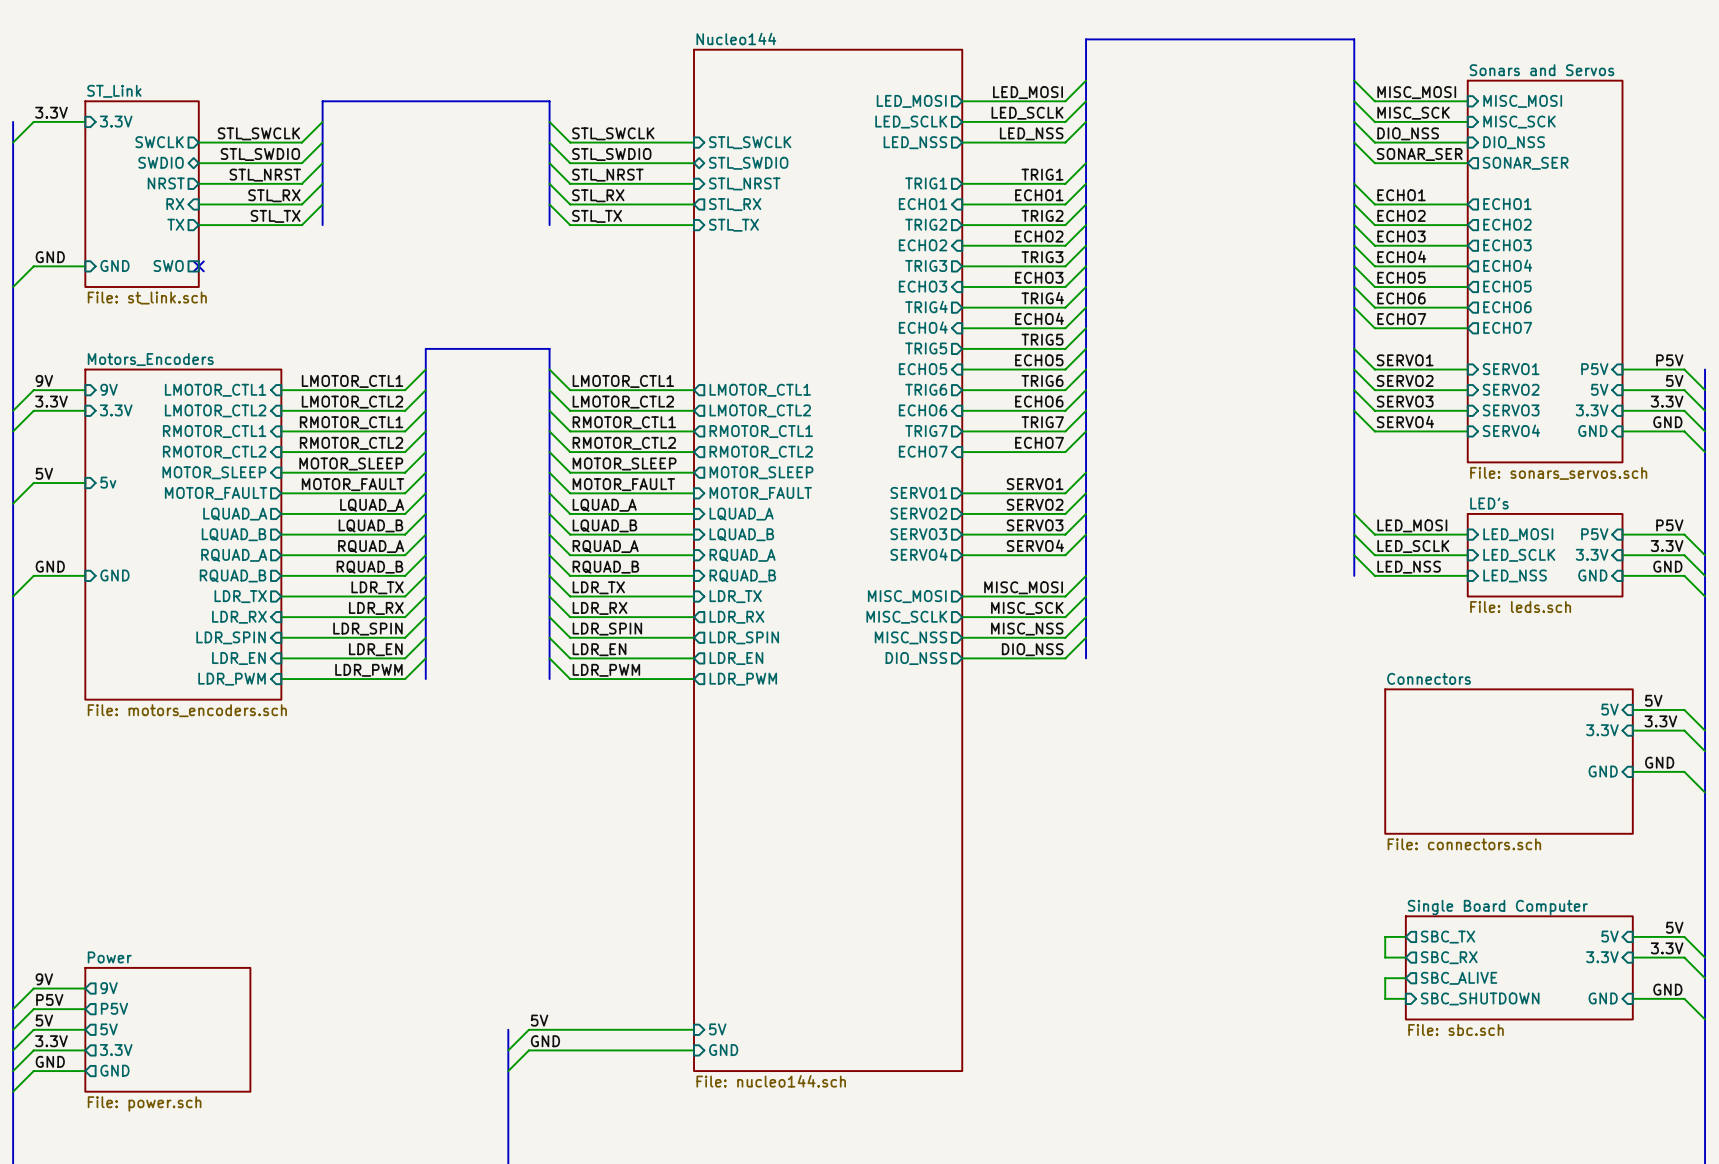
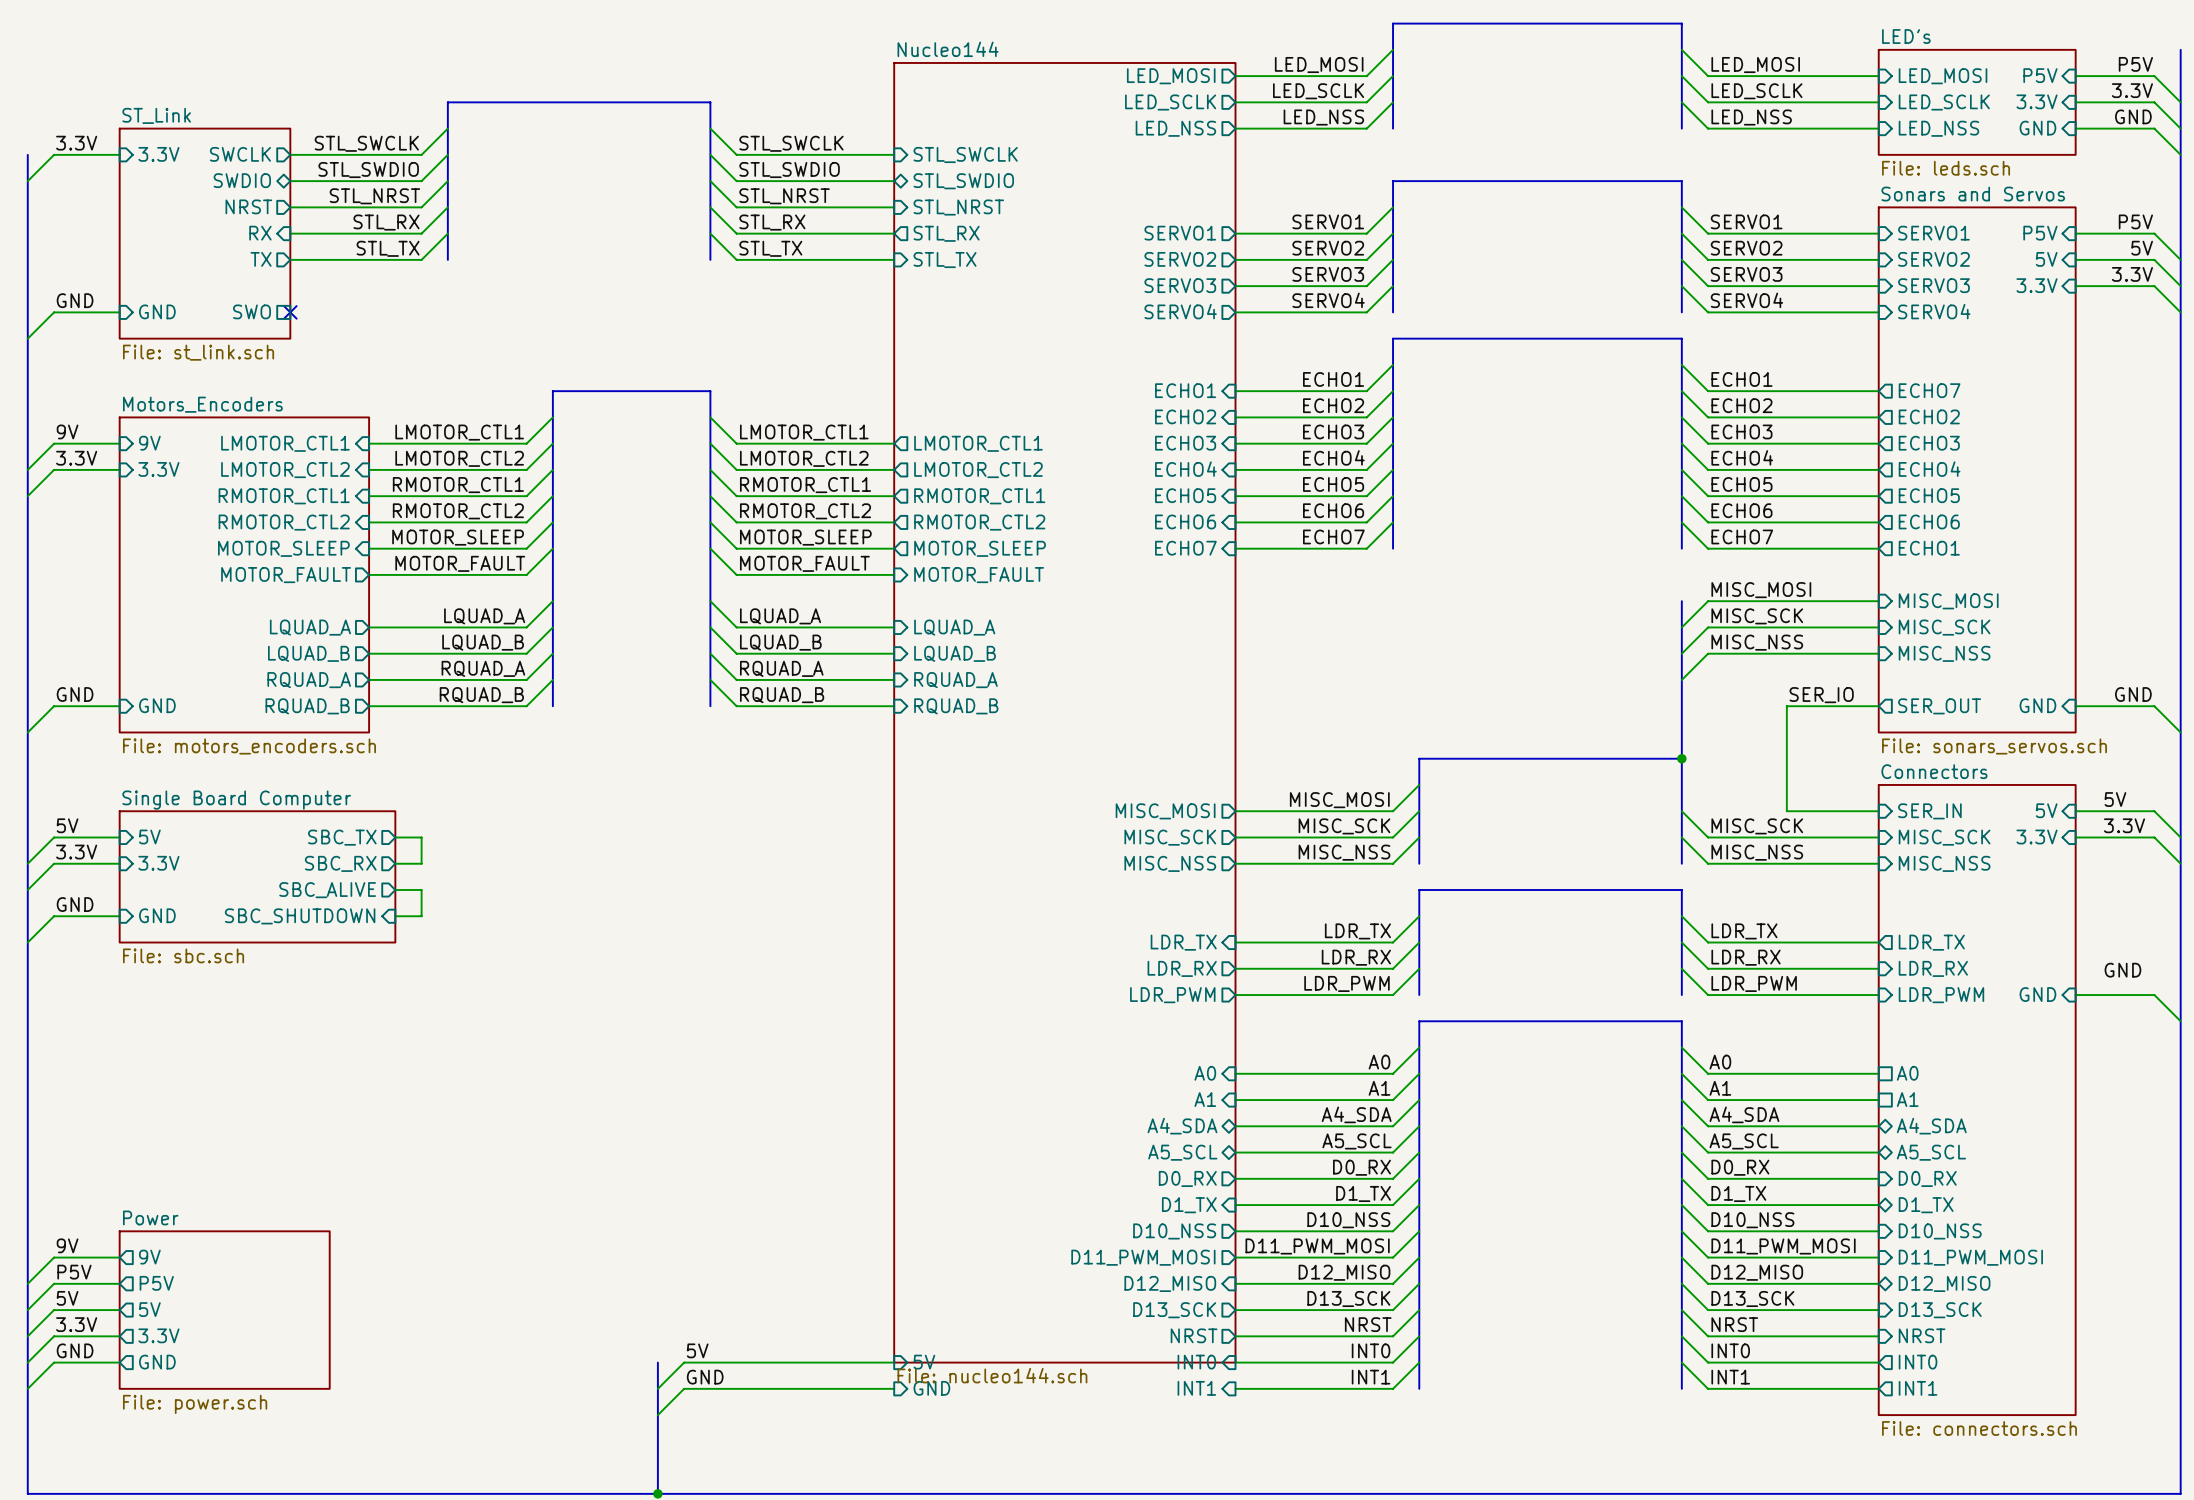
bus: (1086, 39) (1354, 39) (1354, 575) -> (1393, 49) (1393, 23) (1681, 23) (1681, 128)
wire: none -> (1681, 49) (1708, 76) (1878, 76)
bus: none -> (2180, 49) (2180, 469)
label: none -> P5V (2135, 64)
label: none -> LED_MOSI (1319, 65)
label: none -> LED_MOSI (1755, 65)
sheet pin: none -> P5V (2040, 75)
sheet pin: none -> LED_MOSI (1171, 76)
wire: none -> (1681, 76) (1708, 102) (1878, 102)
sheet pin: none -> LED_MOSI (1943, 76)
wire: none -> (2075, 76) (2154, 76) (2180, 102)
label: none -> LED_SCLK (1756, 91)
label: none -> 3.3V (2132, 90)
wire: (1354, 80) (1374, 101) -> (1681, 102) (1708, 128) (1760, 128)
sheet pin: none -> LED_SCLK (1944, 102)
sheet LED's: none -> File: leds.sch (1977, 102)
sheet pin: none -> 3.3V (2037, 101)
wire: none -> (2075, 102) (2154, 102) (2180, 128)
label: LED_MOSI (1027, 92) -> LED_NSS (1323, 117)
label: none -> LED_NSS (1751, 117)
label: MISC_MOSI (1416, 92) -> none
label: none -> GND (2133, 116)
sheet pin: none -> GND (2037, 128)
bus: (549, 101) (322, 101) (322, 225) -> (710, 128) (710, 102) (447, 102) (447, 259)
sheet pin: LED_MOSI (911, 101) -> LED_NSS (1175, 128)
bus: (1086, 101) (1086, 142) -> (1681, 312) (1681, 181) (1393, 181)
wire: (1086, 101) (1065, 121) (962, 121) -> (1393, 49) (1366, 76) (1235, 76)
wire: (1354, 101) (1374, 121) (1467, 121) -> none
sheet pin: MISC_MOSI (1522, 101) -> LED_NSS (1938, 128)
wire: none -> (2075, 128) (2154, 128) (2180, 154)
label: none -> STL_SWCLK (791, 143)
label position: LED_SCLK (1027, 113) -> LED_SCLK (1318, 91)
label: MISC_SCK (1413, 113) -> none
wire: (322, 121) (301, 142) -> (447, 154) (421, 181) (395, 181)
wire: (1086, 121) (1065, 142) (962, 142) -> none
wire: (1354, 121) (1374, 142) (1467, 142) -> none
sheet pin: none -> STL_SWCLK (965, 155)
sheet pin position: LED_SCLK (911, 122) -> LED_SCLK (1170, 102)
sheet pin: MISC_SCK (1519, 122) -> none
label position: STL_SWCLK (258, 133) -> STL_SWCLK (366, 143)
label: STL_SWCLK (613, 133) -> STL_SWDIO (789, 170)
label: LED_NSS (1031, 133) -> none
label: DIO_NSS (1408, 133) -> none
sheet pin position: SWCLK (159, 142) -> SWCLK (240, 154)
wire: (198, 142) (219, 142) -> none
wire: (322, 142) (301, 163) -> (447, 181) (421, 207) (395, 207)
sheet pin shape: input (750, 142) -> bidirectional (963, 181)
sheet pin: STL_SWCLK (750, 142) -> STL_SWDIO (963, 181)
sheet pin: LED_NSS (915, 142) -> none
wire: (1354, 142) (1374, 163) (1467, 163) -> none
sheet pin: DIO_NSS (1514, 142) -> none
label position: STL_SWDIO (260, 154) -> STL_SWDIO (368, 170)
label: STL_SWDIO (611, 154) -> STL_NRST (784, 196)
label: SONAR_SER (1419, 154) -> none
sheet pin position: SWDIO (161, 162) -> SWDIO (242, 180)
wire: (198, 163) (219, 163) -> none
wire: (322, 163) (301, 183) -> (447, 207) (421, 233) (395, 233)
sheet pin shape: bidirectional (748, 163) -> input (958, 207)
sheet pin: STL_SWDIO (748, 163) -> STL_NRST (958, 207)
wire: none -> (1681, 207) (1708, 233) (1878, 233)
sheet pin: SONAR_SER (1525, 163) -> none
label: TRIG1 (1042, 174) -> SERVO1 (1328, 221)
label: none -> P5V (2135, 221)
label position: STL_NRST (265, 175) -> STL_NRST (374, 196)
label: STL_NRST (607, 175) -> STL_RX (772, 222)
sheet ST_Link: none -> File: st_link.sch (205, 233)
sheet pin position: NRST (166, 183) -> NRST (248, 206)
wire: (198, 183) (219, 183) -> none
wire: (322, 183) (301, 204) -> (447, 233) (421, 259) (395, 259)
sheet pin shape: input (744, 183) -> output (946, 233)
sheet pin: STL_NRST (744, 183) -> STL_RX (946, 233)
sheet pin: TRIG1 (926, 183) -> SERVO1 (1180, 233)
wire: (1354, 183) (1374, 204) -> (1681, 233) (1708, 259) (1760, 259)
sheet pin: none -> SERVO1 (1933, 233)
sheet pin: none -> P5V (2040, 233)
sheet ST_Link: File: st_link.sch (142, 194) -> none
label position: STL_RX (274, 195) -> STL_RX (386, 222)
label: STL_RX (598, 195) -> STL_TX (770, 248)
label: ECHO1 (1039, 195) -> SERVO2 (1328, 248)
label position: ECHO1 (1401, 195) -> ECHO1 (1741, 379)
label: none -> 5V (2142, 248)
sheet pin position: RX (175, 204) -> RX (260, 233)
wire: (198, 204) (219, 204) -> none
wire: (322, 204) (301, 225) (198, 225) -> (447, 128) (421, 154) (290, 154)
bus: (549, 204) (549, 225) -> none
wire: (549, 204) (570, 225) (694, 225) -> (710, 128) (736, 154) (894, 154)
sheet pin shape: output (735, 204) -> input (945, 260)
sheet pin: STL_RX (735, 204) -> STL_TX (945, 260)
sheet pin shape: input (923, 204) -> output (1180, 259)
sheet pin: ECHO1 (923, 204) -> SERVO2 (1180, 259)
wire: (1354, 204) (1374, 225) -> (1681, 259) (1708, 286) (1760, 286)
sheet pin shape: output (1507, 204) -> input (1933, 259)
sheet pin: ECHO1 (1507, 204) -> SERVO2 (1933, 259)
sheet pin: none -> 5V (2046, 259)
label: TRIG2 (1042, 215) -> SERVO3 (1328, 274)
label position: ECHO2 (1401, 215) -> ECHO2 (1741, 405)
label: none -> 3.3V (2132, 274)
label position: STL_TX (275, 216) -> STL_TX (388, 248)
label: STL_TX (597, 216) -> none
sheet pin position: TX (175, 224) -> TX (261, 259)
sheet pin: TRIG2 (926, 224) -> SERVO3 (1180, 285)
sheet pin shape: output (1507, 224) -> input (1933, 285)
sheet pin: ECHO2 (1507, 224) -> SERVO3 (1933, 285)
sheet pin: none -> 3.3V (2037, 285)
sheet pin: STL_TX (733, 225) -> none
wire: (1354, 225) (1374, 245) -> (1681, 286) (1708, 312) (1760, 312)
label: ECHO2 (1039, 236) -> SERVO4 (1328, 300)
label position: ECHO3 (1401, 236) -> ECHO3 (1741, 431)
sheet pin shape: input (923, 245) -> output (1180, 311)
sheet pin: ECHO2 (923, 245) -> SERVO4 (1180, 311)
bus: (1086, 245) (1086, 266) -> (1681, 548) (1681, 338) (1393, 338)
wire: (1086, 245) (1065, 266) (962, 266) -> (1393, 76) (1366, 102) (1235, 102)
wire: (1354, 245) (1374, 266) (1467, 266) -> none
sheet pin shape: output (1507, 245) -> input (1934, 311)
sheet pin: ECHO3 (1507, 245) -> SERVO4 (1934, 311)
label position: ECHO4 (1401, 256) -> ECHO4 (1742, 457)
label position: GND (50, 257) -> GND (75, 300)
label: TRIG3 (1042, 257) -> none
sheet pin position: GND (114, 265) -> GND (157, 311)
sheet pin position: SWO (168, 265) -> SWO (251, 311)
sheet pin: TRIG3 (926, 265) -> none
sheet pin: ECHO4 (1507, 265) -> none
wire: (85, 266) (33, 266) (13, 287) -> (119, 312) (54, 312) (27, 338)
no-connect mark position: (198, 266) -> (290, 312)
wire: (1086, 266) (1065, 287) (962, 287) -> none
wire: (1354, 266) (1374, 287) (1467, 287) -> none
sheet Sonars and Servos: File: sonars_servos.sch (1545, 271) -> none
label: ECHO3 (1039, 277) -> none
label position: ECHO5 (1401, 277) -> ECHO5 (1741, 484)
sheet pin: ECHO3 (923, 286) -> none
sheet pin: ECHO5 (1507, 286) -> none
wire: (1354, 287) (1374, 307) -> (1681, 364) (1708, 391) (1760, 391)
label: TRIG4 (1042, 298) -> ECHO1 (1333, 379)
label position: ECHO6 (1401, 298) -> ECHO6 (1741, 510)
sheet pin shape: output (926, 307) -> input (1185, 390)
sheet pin: TRIG4 (926, 307) -> ECHO1 (1185, 390)
wire: (1354, 307) (1374, 328) -> (1681, 391) (1708, 417) (1760, 417)
sheet pin: ECHO6 (1507, 307) -> ECHO7 (1929, 390)
label: ECHO4 (1039, 318) -> ECHO2 (1333, 405)
label position: ECHO7 (1401, 319) -> ECHO7 (1742, 536)
sheet pin: ECHO4 (923, 327) -> ECHO2 (1185, 416)
sheet pin: ECHO7 (1507, 327) -> ECHO2 (1929, 416)
wire: none -> (552, 417) (526, 443) (369, 443)
wire: none -> (710, 417) (736, 443) (894, 443)
wire: none -> (1681, 417) (1708, 443) (1878, 443)
label: TRIG5 (1042, 339) -> ECHO3 (1333, 431)
label: none -> LMOTOR_CTL1 (459, 432)
label: none -> LMOTOR_CTL1 (804, 432)
bus: (425, 348) (549, 348) -> (552, 443) (552, 391) (710, 391) (710, 443)
sheet pin shape: output (926, 348) -> input (1185, 443)
sheet pin: TRIG5 (926, 348) -> ECHO3 (1185, 443)
wire: (1354, 348) (1374, 369) -> (1681, 443) (1708, 469) (1760, 469)
sheet pin: none -> ECHO3 (1929, 443)
sheet pin: none -> LMOTOR_CTL1 (285, 443)
sheet pin: none -> LMOTOR_CTL1 (978, 443)
label: none -> LMOTOR_CTL2 (459, 458)
label: none -> LMOTOR_CTL2 (804, 458)
label: ECHO5 (1039, 360) -> ECHO4 (1333, 457)
label position: SERVO1 (1405, 360) -> SERVO1 (1746, 221)
label: P5V (1669, 360) -> none
sheet pin: none -> LMOTOR_CTL2 (285, 470)
sheet pin: none -> LMOTOR_CTL2 (978, 470)
sheet pin: ECHO5 (923, 369) -> ECHO4 (1185, 469)
wire: (1354, 369) (1374, 390) -> (1681, 469) (1708, 496) (1760, 496)
sheet pin shape: input (1511, 369) -> output (1929, 469)
sheet pin: SERVO1 (1511, 369) -> ECHO4 (1929, 469)
sheet Sonars and Servos: none -> File: sonars_servos.sch (1977, 469)
sheet pin: P5V (1594, 369) -> none
wire: (1622, 369) (1684, 369) (1705, 390) -> (2075, 233) (2154, 233) (2180, 259)
label position: 9V (44, 380) -> 9V (67, 431)
label: TRIG6 (1042, 380) -> ECHO5 (1333, 484)
label position: SERVO2 (1405, 380) -> SERVO2 (1746, 248)
label: 5V (1674, 380) -> none
label: LMOTOR_CTL1 (352, 381) -> RMOTOR_CTL1 (458, 485)
label: LMOTOR_CTL1 (623, 381) -> RMOTOR_CTL1 (805, 485)
sheet pin position: 9V (109, 389) -> 9V (149, 443)
sheet pin shape: output (926, 389) -> input (1185, 495)
sheet pin: TRIG6 (926, 389) -> ECHO5 (1185, 495)
sheet pin shape: input (1511, 389) -> output (1929, 495)
sheet pin: SERVO2 (1511, 389) -> ECHO5 (1929, 495)
sheet pin: 5V (1599, 389) -> none
wire: (85, 390) (33, 390) (13, 410) -> (119, 469) (54, 469) (27, 496)
sheet pin: LMOTOR_CTL1 (215, 390) -> RMOTOR_CTL1 (284, 496)
sheet pin: LMOTOR_CTL1 (760, 390) -> RMOTOR_CTL1 (979, 496)
wire: (1354, 390) (1374, 410) -> (1681, 496) (1708, 522) (1760, 522)
wire: (1622, 390) (1684, 390) (1705, 410) -> (2075, 259) (2154, 259) (2180, 286)
label position: 3.3V (51, 401) -> 3.3V (76, 458)
label position: SERVO3 (1405, 401) -> SERVO3 (1746, 274)
label: 3.3V (1667, 401) -> none
label: LMOTOR_CTL2 (352, 402) -> RMOTOR_CTL2 (458, 511)
label: LMOTOR_CTL2 (623, 402) -> RMOTOR_CTL2 (805, 511)
wire: (85, 410) (33, 410) (13, 431) -> (119, 443) (54, 443) (27, 469)
sheet pin position: 3.3V (116, 410) -> 3.3V (158, 469)
sheet pin: LMOTOR_CTL2 (215, 410) -> RMOTOR_CTL2 (284, 522)
sheet pin: LMOTOR_CTL2 (760, 410) -> RMOTOR_CTL2 (979, 522)
wire: (1354, 410) (1374, 431) -> (1681, 522) (1708, 548) (1760, 548)
sheet pin shape: input (1511, 410) -> output (1929, 521)
sheet pin: SERVO3 (1511, 410) -> ECHO6 (1929, 521)
sheet pin: 3.3V (1592, 410) -> none
wire: (1622, 410) (1684, 410) (1705, 431) -> (2075, 286) (2154, 286) (2180, 312)
label position: SERVO4 (1405, 421) -> SERVO4 (1746, 300)
label: RMOTOR_CTL1 (351, 422) -> MOTOR_SLEEP (458, 537)
label: RMOTOR_CTL1 (624, 422) -> MOTOR_SLEEP (805, 537)
label: TRIG7 (1042, 422) -> ECHO7 (1333, 536)
label: GND (1667, 422) -> none
sheet pin shape: input (1511, 430) -> output (1929, 548)
sheet pin: SERVO4 (1511, 430) -> ECHO1 (1929, 548)
sheet pin: RMOTOR_CTL1 (214, 431) -> MOTOR_SLEEP (283, 548)
sheet pin: RMOTOR_CTL1 (761, 431) -> MOTOR_SLEEP (980, 548)
sheet pin shape: output (926, 431) -> input (1185, 548)
sheet pin: TRIG7 (926, 431) -> ECHO7 (1185, 548)
bus: (1086, 431) (1086, 658) -> none
wire: (1086, 431) (1065, 452) (962, 452) -> none
sheet pin: GND (1592, 431) -> none
wire: (1622, 431) (1684, 431) (1705, 452) -> none
label: ECHO7 (1039, 442) -> none
label: RMOTOR_CTL2 (351, 443) -> MOTOR_FAULT (460, 563)
label: RMOTOR_CTL2 (624, 443) -> MOTOR_FAULT (804, 563)
sheet pin: ECHO7 (923, 451) -> none
sheet Motors_Encoders: none -> File: motors_encoders.sch (244, 574)
sheet pin shape: input (214, 452) -> output (286, 575)
sheet pin: RMOTOR_CTL2 (214, 452) -> MOTOR_FAULT (286, 575)
wire: (425, 452) (405, 472) (281, 472) -> (552, 443) (526, 469) (369, 469)
wire: (549, 452) (570, 472) (694, 472) -> (710, 443) (736, 469) (894, 469)
sheet pin shape: output (761, 452) -> input (979, 575)
sheet pin: RMOTOR_CTL2 (761, 452) -> MOTOR_FAULT (979, 575)
label: MOTOR_SLEEP (351, 463) -> none
label: MOTOR_SLEEP (624, 463) -> none
label: none -> MISC_MOSI (1761, 590)
sheet pin: MOTOR_SLEEP (214, 472) -> none
sheet pin: MOTOR_SLEEP (761, 472) -> none
wire: (1086, 472) (1065, 493) (962, 493) -> none
bus: none -> (1681, 601) (1681, 863)
wire: none -> (1878, 601) (1708, 601) (1681, 627)
sheet pin: none -> MISC_MOSI (1948, 601)
label position: 5V (44, 473) -> 5V (67, 825)
sheet pin: 5v (108, 482) -> none
wire: (85, 483) (33, 483) (13, 503) -> (119, 837) (54, 837) (27, 863)
label: MOTOR_FAULT (352, 484) -> LQUAD_A (484, 616)
label: MOTOR_FAULT (623, 484) -> LQUAD_A (780, 616)
label: SERVO1 (1035, 484) -> none
label: none -> MISC_SCK (1757, 616)
sheet pin: SERVO1 (918, 492) -> none
sheet pin: MOTOR_FAULT (216, 493) -> LQUAD_A (310, 627)
sheet pin: MOTOR_FAULT (760, 493) -> LQUAD_A (954, 627)
wire: (1086, 493) (1065, 513) (962, 513) -> none
wire: none -> (1878, 627) (1708, 627) (1681, 653)
sheet pin: none -> MISC_SCK (1944, 627)
label: SERVO2 (1035, 504) -> none
label: LQUAD_A (372, 505) -> LQUAD_B (483, 642)
label: LQUAD_A (604, 505) -> LQUAD_B (780, 642)
label: none -> MISC_NSS (1757, 642)
sheet pin: SERVO2 (918, 513) -> none
wire: (1086, 513) (1065, 534) (962, 534) -> none
wire: (1354, 513) (1374, 534) (1467, 534) -> none
wire: none -> (1878, 653) (1708, 653) (1681, 679)
sheet pin: LQUAD_A (235, 514) -> LQUAD_B (308, 653)
sheet pin: LQUAD_A (741, 514) -> LQUAD_B (955, 653)
sheet pin: none -> MISC_NSS (1944, 653)
label: LQUAD_B (370, 525) -> RQUAD_A (483, 668)
label: LQUAD_B (604, 525) -> RQUAD_A (781, 668)
label: SERVO3 (1035, 525) -> none
label: LED_MOSI (1412, 525) -> none
label: P5V (1669, 525) -> none
sheet Motors_Encoders: File: motors_encoders.sch (183, 534) -> none
sheet pin: LQUAD_B (234, 534) -> RQUAD_A (309, 680)
sheet pin: LQUAD_B (741, 534) -> RQUAD_A (955, 680)
sheet pin: SERVO3 (918, 534) -> none
wire: (1086, 534) (1065, 555) (962, 555) -> none
wire: (1354, 534) (1374, 555) (1395, 555) -> (1878, 811) (1786, 811) (1786, 706)
sheet pin: LED_MOSI (1518, 534) -> none
sheet pin: P5V (1594, 534) -> none
wire: (1622, 534) (1684, 534) (1705, 555) -> (2075, 811) (2154, 811) (2180, 837)
label: SERVO4 (1035, 545) -> none
label: RQUAD_A (371, 546) -> RQUAD_B (481, 695)
label: RQUAD_A (605, 546) -> RQUAD_B (782, 695)
label: LED_SCLK (1413, 546) -> none
label: none -> SER_IO (1821, 695)
label: 3.3V (1667, 546) -> GND (2133, 694)
sheet pin: SERVO4 (919, 554) -> none
sheet pin: 3.3V (1592, 554) -> GND (2037, 705)
sheet pin: RQUAD_A (234, 555) -> RQUAD_B (307, 706)
bus: (425, 555) (425, 679) -> none
wire: (425, 555) (405, 575) (281, 575) -> none
bus: (549, 555) (549, 679) -> none
wire: (549, 555) (570, 575) (694, 575) -> none
sheet pin: RQUAD_A (742, 555) -> RQUAD_B (956, 706)
wire: (1354, 555) (1374, 575) (1467, 575) -> none
sheet pin shape: input (1519, 555) -> output (1939, 706)
sheet pin: LED_SCLK (1519, 555) -> SER_OUT (1939, 706)
sheet LED's: File: leds.sch (1545, 555) -> none
label position: GND (50, 566) -> GND (75, 694)
label: GND (1667, 566) -> none
label: RQUAD_B (369, 567) -> none
label: RQUAD_B (605, 567) -> none
label: LED_NSS (1409, 567) -> none
wire: (85, 575) (33, 575) (13, 596) -> (119, 706) (54, 706) (27, 732)
sheet pin position: GND (114, 575) -> GND (157, 705)
sheet pin: RQUAD_B (233, 575) -> none
wire: (425, 575) (405, 596) (281, 596) -> none
wire: (549, 575) (570, 596) (694, 596) -> none
sheet pin: RQUAD_B (742, 575) -> none
wire: (1086, 575) (1065, 596) (962, 596) -> none
sheet pin: LED_NSS (1515, 575) -> none
sheet pin: GND (1592, 575) -> none
wire: (1622, 575) (1684, 575) (1705, 596) -> (2075, 837) (2154, 837) (2180, 863)
label: LDR_TX (377, 587) -> none
label: LDR_TX (598, 587) -> none
label position: MISC_MOSI (1023, 587) -> MISC_MOSI (1339, 800)
sheet pin: LDR_TX (240, 596) -> none
wire: (425, 596) (405, 617) (281, 617) -> none
wire: (549, 596) (570, 617) (694, 617) -> none
sheet pin: LDR_TX (735, 596) -> none
sheet pin: MISC_MOSI (907, 596) -> none
wire: (1086, 596) (1065, 617) (962, 617) -> none
bus: none -> (1681, 758) (1419, 758) (1419, 863)
junction: none -> (1681, 758)
label: LDR_RX (376, 608) -> none
label: LDR_RX (600, 608) -> none
label position: MISC_SCK (1027, 608) -> MISC_SCK (1344, 826)
sheet pin: LDR_RX (239, 617) -> none
wire: (425, 617) (405, 637) (281, 637) -> none
wire: (549, 617) (570, 637) (694, 637) -> none
sheet pin: LDR_RX (736, 617) -> none
sheet pin: MISC_SCLK (906, 617) -> none
wire: (1086, 617) (1065, 637) -> (1419, 784) (1393, 811) (1366, 811)
label: LDR_SPIN (367, 629) -> none
label: LDR_SPIN (607, 629) -> none
label position: MISC_NSS (1027, 629) -> MISC_NSS (1344, 852)
sheet pin: LDR_SPIN (231, 637) -> none
wire: (425, 637) (405, 658) (322, 658) -> none
wire: (549, 637) (570, 658) (694, 658) -> none
sheet pin: LDR_SPIN (744, 637) -> none
sheet pin: MISC_NSS (910, 637) -> MISC_MOSI (1165, 811)
wire: (1086, 637) (1065, 658) -> (1419, 811) (1393, 837) (1366, 837)
wire: none -> (1681, 811) (1708, 837) (1878, 837)
sheet pin: none -> SER_IN (1929, 811)
label: LDR_EN (375, 649) -> none
label: LDR_EN (599, 649) -> none
label: DIO_NSS (1032, 649) -> none
label: none -> MISC_SCK (1757, 826)
sheet pin: none -> 5V (149, 837)
sheet pin: LDR_EN (238, 658) -> none
sheet pin: none -> SBC_TX (342, 837)
wire: (281, 658) (301, 658) -> none
wire: (425, 658) (405, 679) (322, 679) -> (421, 837) (421, 863)
wire: (549, 658) (570, 679) (694, 679) -> none
sheet pin: LDR_EN (736, 658) -> none
sheet pin: DIO_NSS (916, 658) -> MISC_SCK (1170, 837)
wire: none -> (1419, 837) (1393, 863) (1235, 863)
wire: none -> (1681, 837) (1708, 863) (1878, 863)
sheet pin: none -> MISC_SCK (1944, 837)
label: none -> 3.3V (76, 852)
label: LDR_PWM (368, 670) -> none
label: LDR_PWM (606, 670) -> none
label: none -> MISC_NSS (1757, 852)
sheet pin: none -> 3.3V (158, 863)
wire: none -> (119, 863) (54, 863) (27, 890)
sheet pin: LDR_PWM (232, 679) -> none
sheet pin: none -> SBC_RX (340, 863)
wire: (281, 679) (301, 679) -> none
sheet pin: LDR_PWM (743, 679) -> none
sheet pin: none -> MISC_NSS (1170, 863)
sheet pin: none -> MISC_NSS (1944, 863)
sheet Single Board Computer: none -> File: sbc.sch (257, 876)
sheet pin: none -> SBC_ALIVE (327, 890)
wire: none -> (395, 890) (421, 890) (421, 916) (395, 916)
label position: 5V (1653, 700) -> 5V (2115, 799)
sheet pin position: 5V (1610, 709) -> 5V (2046, 810)
wire: (1632, 709) (1684, 709) (1705, 730) -> none
label: none -> GND (75, 904)
sheet pin: none -> GND (157, 915)
wire: none -> (119, 916) (54, 916) (27, 942)
sheet pin: none -> SBC_SHUTDOWN (300, 916)
wire: none -> (1419, 916) (1393, 942) (1235, 942)
wire: none -> (1681, 916) (1708, 942) (1878, 942)
label position: 3.3V (1660, 721) -> 3.3V (2124, 825)
sheet pin position: 3.3V (1602, 730) -> 3.3V (2037, 837)
wire: (1632, 730) (1684, 730) (1705, 751) -> none
label: none -> LDR_TX (1357, 931)
label: none -> LDR_TX (1744, 931)
wire: none -> (1419, 942) (1393, 968) (1235, 968)
wire: none -> (1681, 942) (1708, 968) (1878, 968)
sheet pin: none -> LDR_TX (1183, 942)
sheet pin: none -> LDR_TX (1931, 942)
label: none -> LDR_RX (1356, 957)
label: none -> LDR_RX (1746, 957)
sheet pin: none -> LDR_RX (1182, 968)
wire: none -> (1419, 968) (1393, 995) (1235, 995)
wire: none -> (1681, 968) (1708, 995) (1878, 995)
sheet Connectors: File: connectors.sch (1509, 761) -> none
sheet pin: none -> LDR_RX (1933, 968)
sheet pin position: GND (1603, 771) -> GND (2037, 994)
wire: (1632, 771) (1684, 771) (1705, 792) -> none
label: none -> LDR_PWM (1346, 983)
label: none -> LDR_PWM (1754, 983)
sheet pin: none -> LDR_PWM (1172, 995)
bus: none -> (1419, 995) (1419, 890) (1681, 890) (1681, 995)
sheet pin: none -> LDR_PWM (1941, 995)
wire: none -> (2075, 995) (2154, 995) (2180, 1021)
wire: none -> (1419, 1047) (1393, 1073) (1235, 1073)
wire: none -> (1681, 1047) (1708, 1073) (1878, 1073)
label: none -> A0 (1379, 1062)
label: none -> A0 (1720, 1062)
sheet pin: none -> A0 (1205, 1073)
sheet pin: none -> A0 (1907, 1073)
wire: none -> (1419, 1073) (1393, 1100) (1235, 1100)
wire: none -> (1681, 1073) (1708, 1100) (1878, 1100)
label: none -> A1 (1379, 1088)
label: none -> A1 (1720, 1088)
sheet pin: none -> A1 (1205, 1099)
wire: none -> (1419, 1100) (1393, 1126) (1235, 1126)
wire: none -> (1681, 1100) (1708, 1126) (1878, 1126)
sheet pin: none -> A1 (1907, 1099)
sheet Connectors: none -> File: connectors.sch (1977, 1100)
label: none -> A4_SDA (1356, 1114)
label: none -> A4_SDA (1744, 1114)
sheet pin: none -> A4_SDA (1182, 1126)
wire: none -> (1419, 1126) (1393, 1152) (1235, 1152)
wire: none -> (1681, 1126) (1708, 1152) (1878, 1152)
sheet pin: none -> A4_SDA (1931, 1126)
label: none -> A5_SCL (1356, 1141)
label: none -> A5_SCL (1744, 1141)
wire: none -> (1419, 1152) (1393, 1178) (1235, 1178)
wire: none -> (1681, 1152) (1708, 1178) (1878, 1178)
sheet pin: none -> A5_SCL (1182, 1152)
sheet pin: none -> A5_SCL (1931, 1152)
label: none -> D0_RX (1361, 1167)
label: none -> D0_RX (1740, 1167)
sheet pin: none -> D0_RX (1187, 1178)
wire: none -> (1419, 1178) (1393, 1205) (1235, 1205)
wire: none -> (1681, 1178) (1708, 1205) (1878, 1205)
sheet pin: none -> D0_RX (1927, 1178)
label: 5V (1674, 927) -> none
wire: (1405, 936) (1385, 936) (1385, 957) (1405, 957) -> none
sheet pin: 5V (1610, 936) -> none
wire: (1632, 936) (1684, 936) (1705, 957) -> none
sheet pin: SBC_TX (1448, 937) -> none
label: none -> D1_TX (1363, 1193)
label: none -> D1_TX (1738, 1193)
sheet pin: none -> D1_TX (1189, 1205)
wire: none -> (1419, 1205) (1393, 1231) (1235, 1231)
wire: none -> (1681, 1205) (1708, 1231) (1878, 1231)
sheet pin: none -> D1_TX (1926, 1205)
label: 3.3V (1667, 948) -> none
sheet pin: SBC_RX (1449, 957) -> none
sheet pin: 3.3V (1602, 957) -> none
wire: (1632, 957) (1684, 957) (1705, 978) -> none
label: none -> D10_NSS (1348, 1220)
label: none -> D10_NSS (1752, 1220)
wire: none -> (1419, 1231) (1393, 1257) (1235, 1257)
wire: none -> (1681, 1231) (1708, 1257) (1878, 1257)
sheet Single Board Computer: File: sbc.sch (1519, 967) -> none
sheet pin: none -> D10_NSS (1174, 1231)
sheet pin: none -> D10_NSS (1940, 1231)
wire: (1405, 978) (1385, 978) (1385, 998) (1405, 998) -> none
sheet pin: SBC_ALIVE (1459, 978) -> none
label: none -> D11_PWM_MOSI (1317, 1246)
label: none -> D11_PWM_MOSI (1783, 1246)
sheet pin: none -> D11_PWM_MOSI (1143, 1257)
wire: none -> (1419, 1257) (1393, 1283) (1235, 1283)
wire: none -> (1681, 1257) (1708, 1283) (1878, 1283)
sheet pin: none -> D11_PWM_MOSI (1970, 1257)
label: GND (1667, 989) -> none
sheet pin: SBC_SHUTDOWN (1480, 998) -> none
sheet pin: GND (1603, 998) -> none
wire: (1632, 998) (1684, 998) (1705, 1019) -> none
label: none -> D12_MISO (1344, 1272)
label: none -> D12_MISO (1757, 1272)
sheet pin: none -> D12_MISO (1170, 1283)
wire: none -> (1419, 1283) (1393, 1310) (1235, 1310)
wire: none -> (1681, 1283) (1708, 1310) (1878, 1310)
sheet pin: none -> D12_MISO (1944, 1283)
label position: 5V (539, 1020) -> 5V (697, 1350)
label: none -> D13_SCK (1348, 1298)
label: none -> D13_SCK (1752, 1298)
bus: (508, 1029) (508, 1071) -> none
wire: (694, 1029) (528, 1029) (508, 1050) -> (894, 1362) (684, 1362) (657, 1388)
sheet pin position: 5V (717, 1029) -> 5V (924, 1362)
sheet pin: none -> D13_SCK (1174, 1310)
wire: none -> (1419, 1310) (1393, 1336) (1235, 1336)
wire: none -> (1681, 1310) (1708, 1336) (1878, 1336)
sheet pin: none -> D13_SCK (1940, 1310)
label position: GND (545, 1041) -> GND (705, 1377)
label: none -> NRST (1368, 1324)
label: none -> NRST (1734, 1324)
wire: (694, 1050) (528, 1050) (508, 1071) -> (894, 1388) (684, 1388) (657, 1415)
sheet pin position: GND (723, 1050) -> GND (931, 1388)
sheet pin: none -> NRST (1194, 1335)
wire: none -> (1419, 1336) (1393, 1362) (1235, 1362)
wire: none -> (1681, 1336) (1708, 1362) (1878, 1362)
sheet pin: none -> NRST (1922, 1335)
label: none -> INT0 (1371, 1350)
label: none -> INT0 (1730, 1350)
sheet pin: none -> INT0 (1196, 1362)
sheet pin: none -> INT0 (1918, 1362)
wire: none -> (1419, 1362) (1393, 1388) (1235, 1388)
wire: none -> (1681, 1362) (1708, 1388) (1878, 1388)
label: none -> INT1 (1371, 1377)
label: none -> INT1 (1730, 1377)
sheet pin: none -> INT1 (1196, 1388)
bus: none -> (1419, 1388) (1419, 1021) (1681, 1021) (1681, 1388)
sheet pin: none -> INT1 (1918, 1388)

